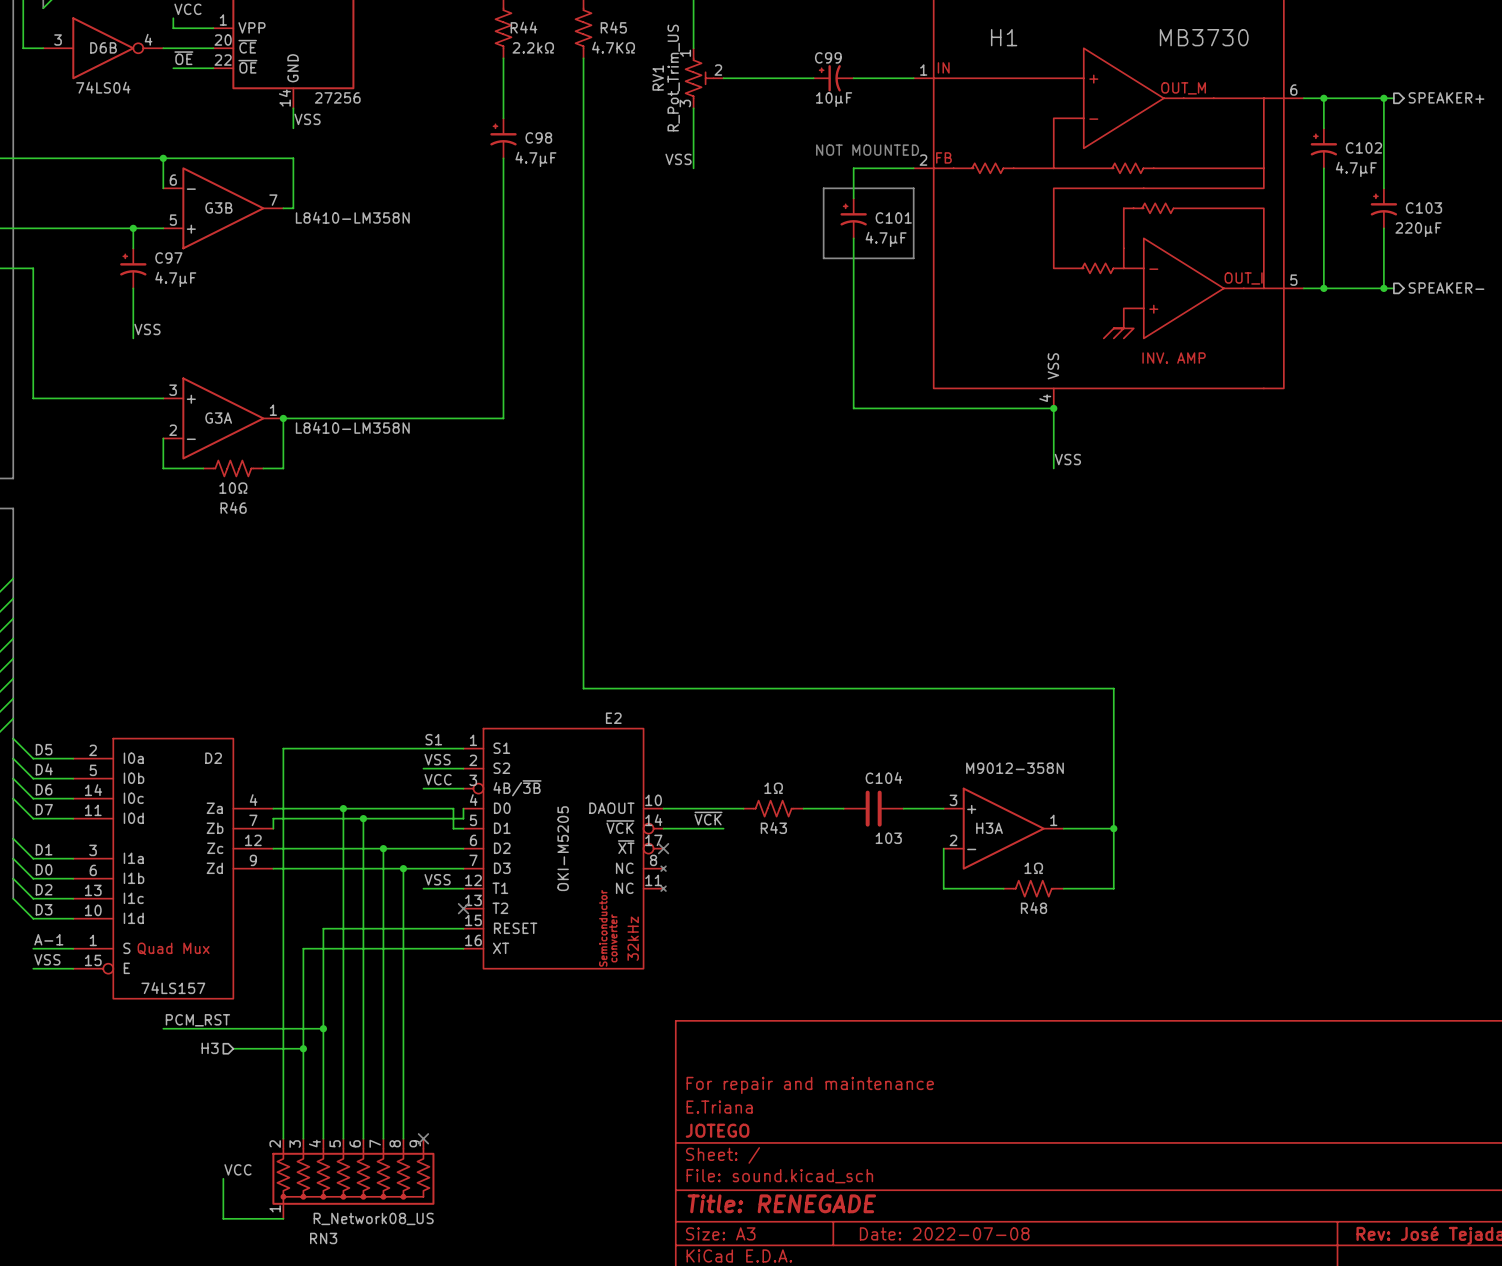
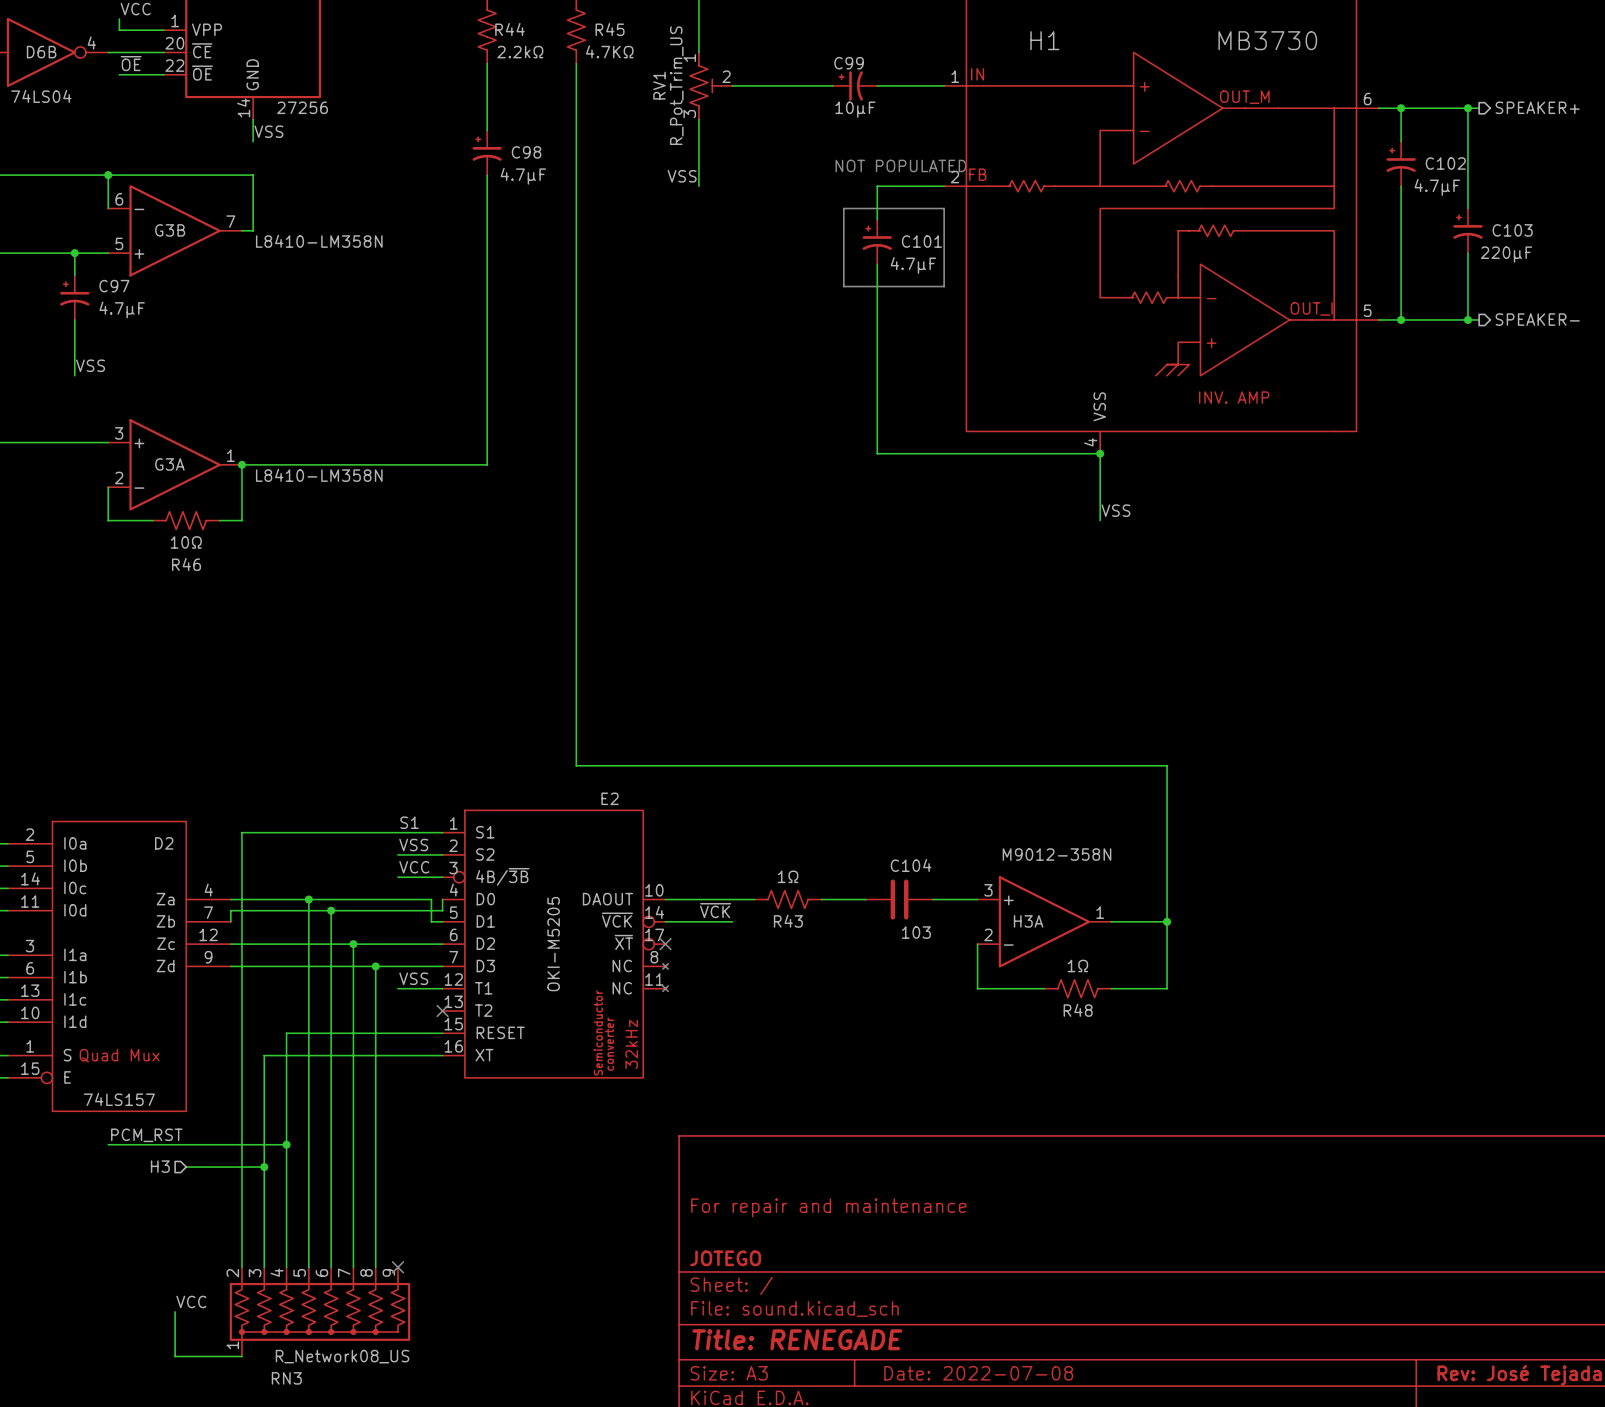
text: NOT MOUNTED (867, 150) -> NOT POPULATED (900, 165)
title block: E.Triana (719, 1107) -> none

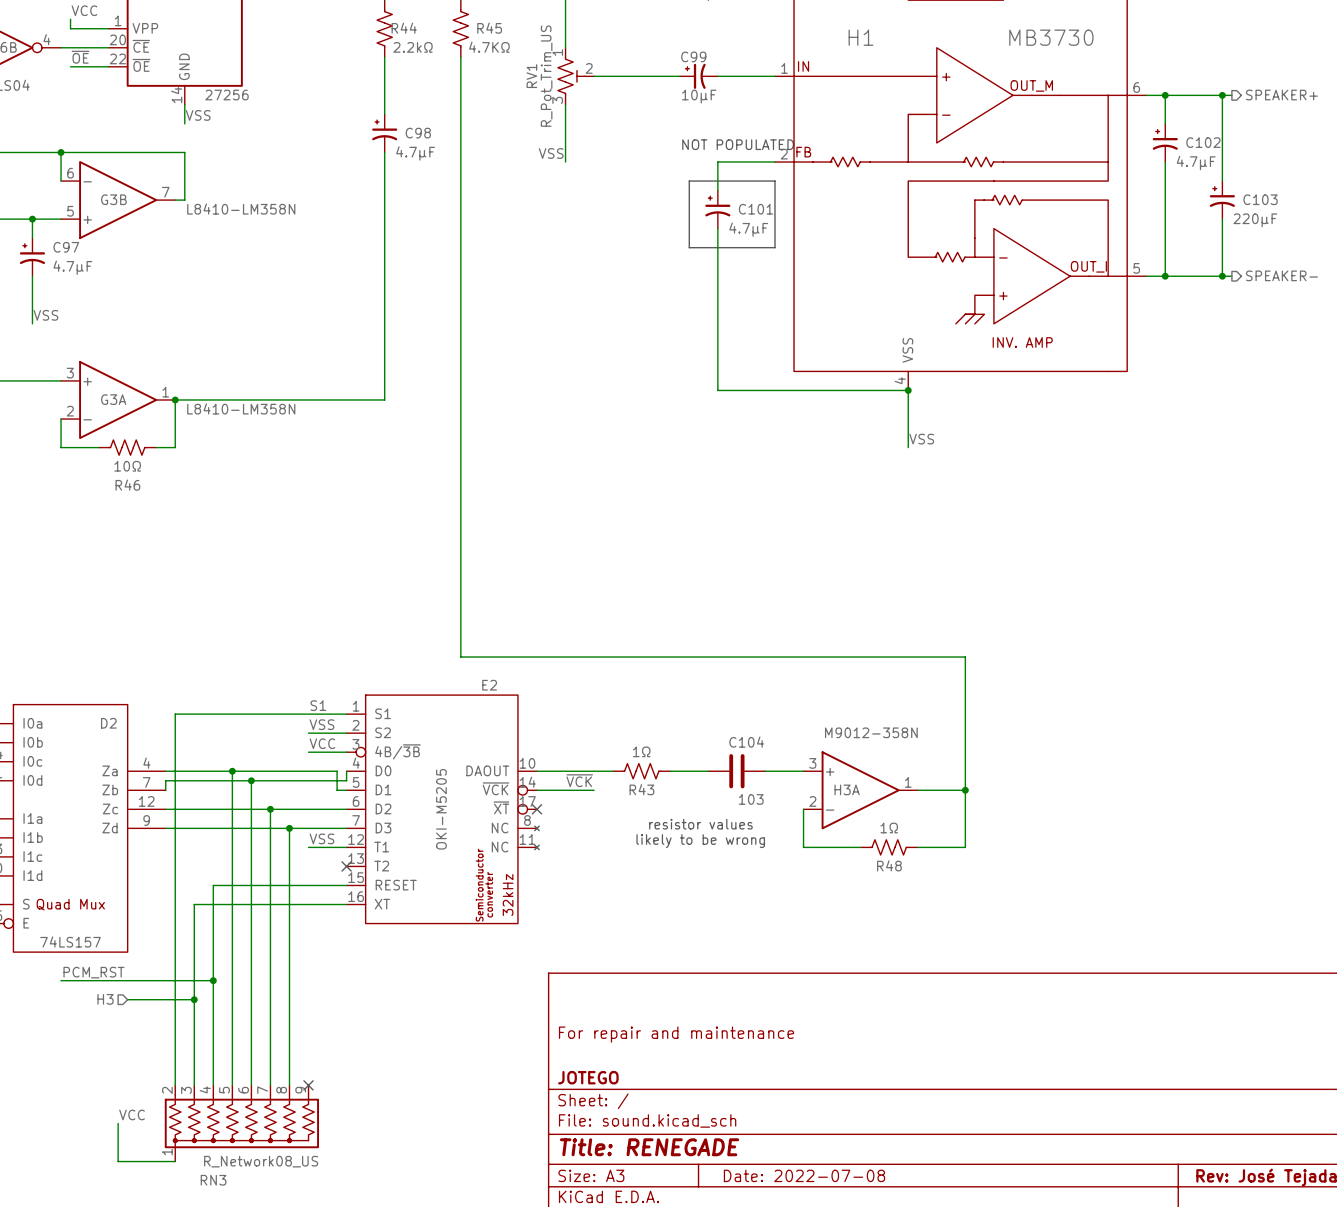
text: none -> resistor values (700, 824)
text: none -> likely to be wrong (700, 841)

